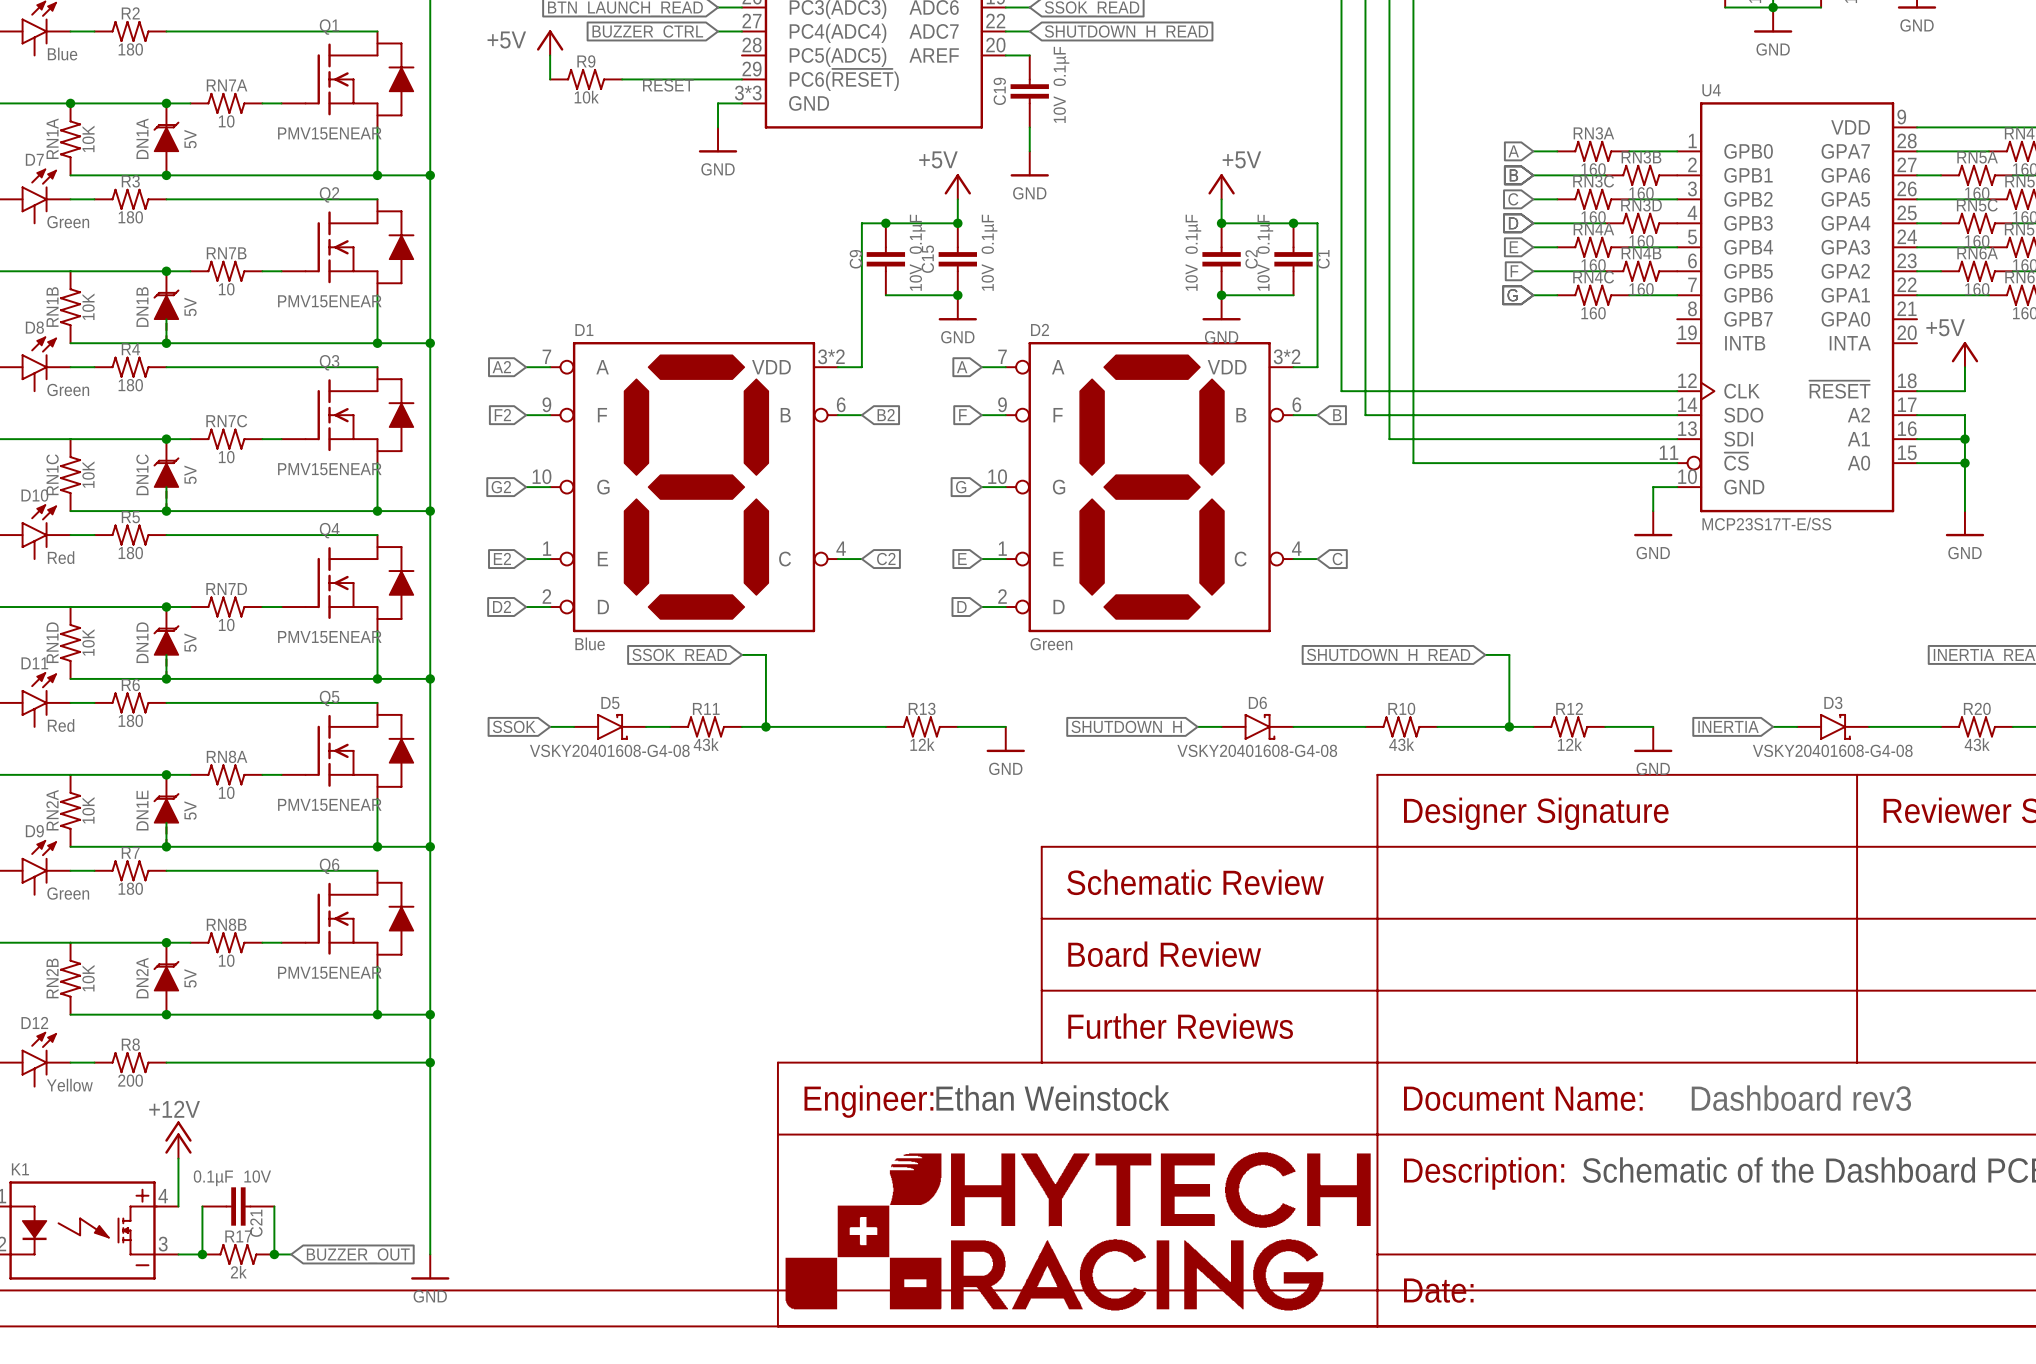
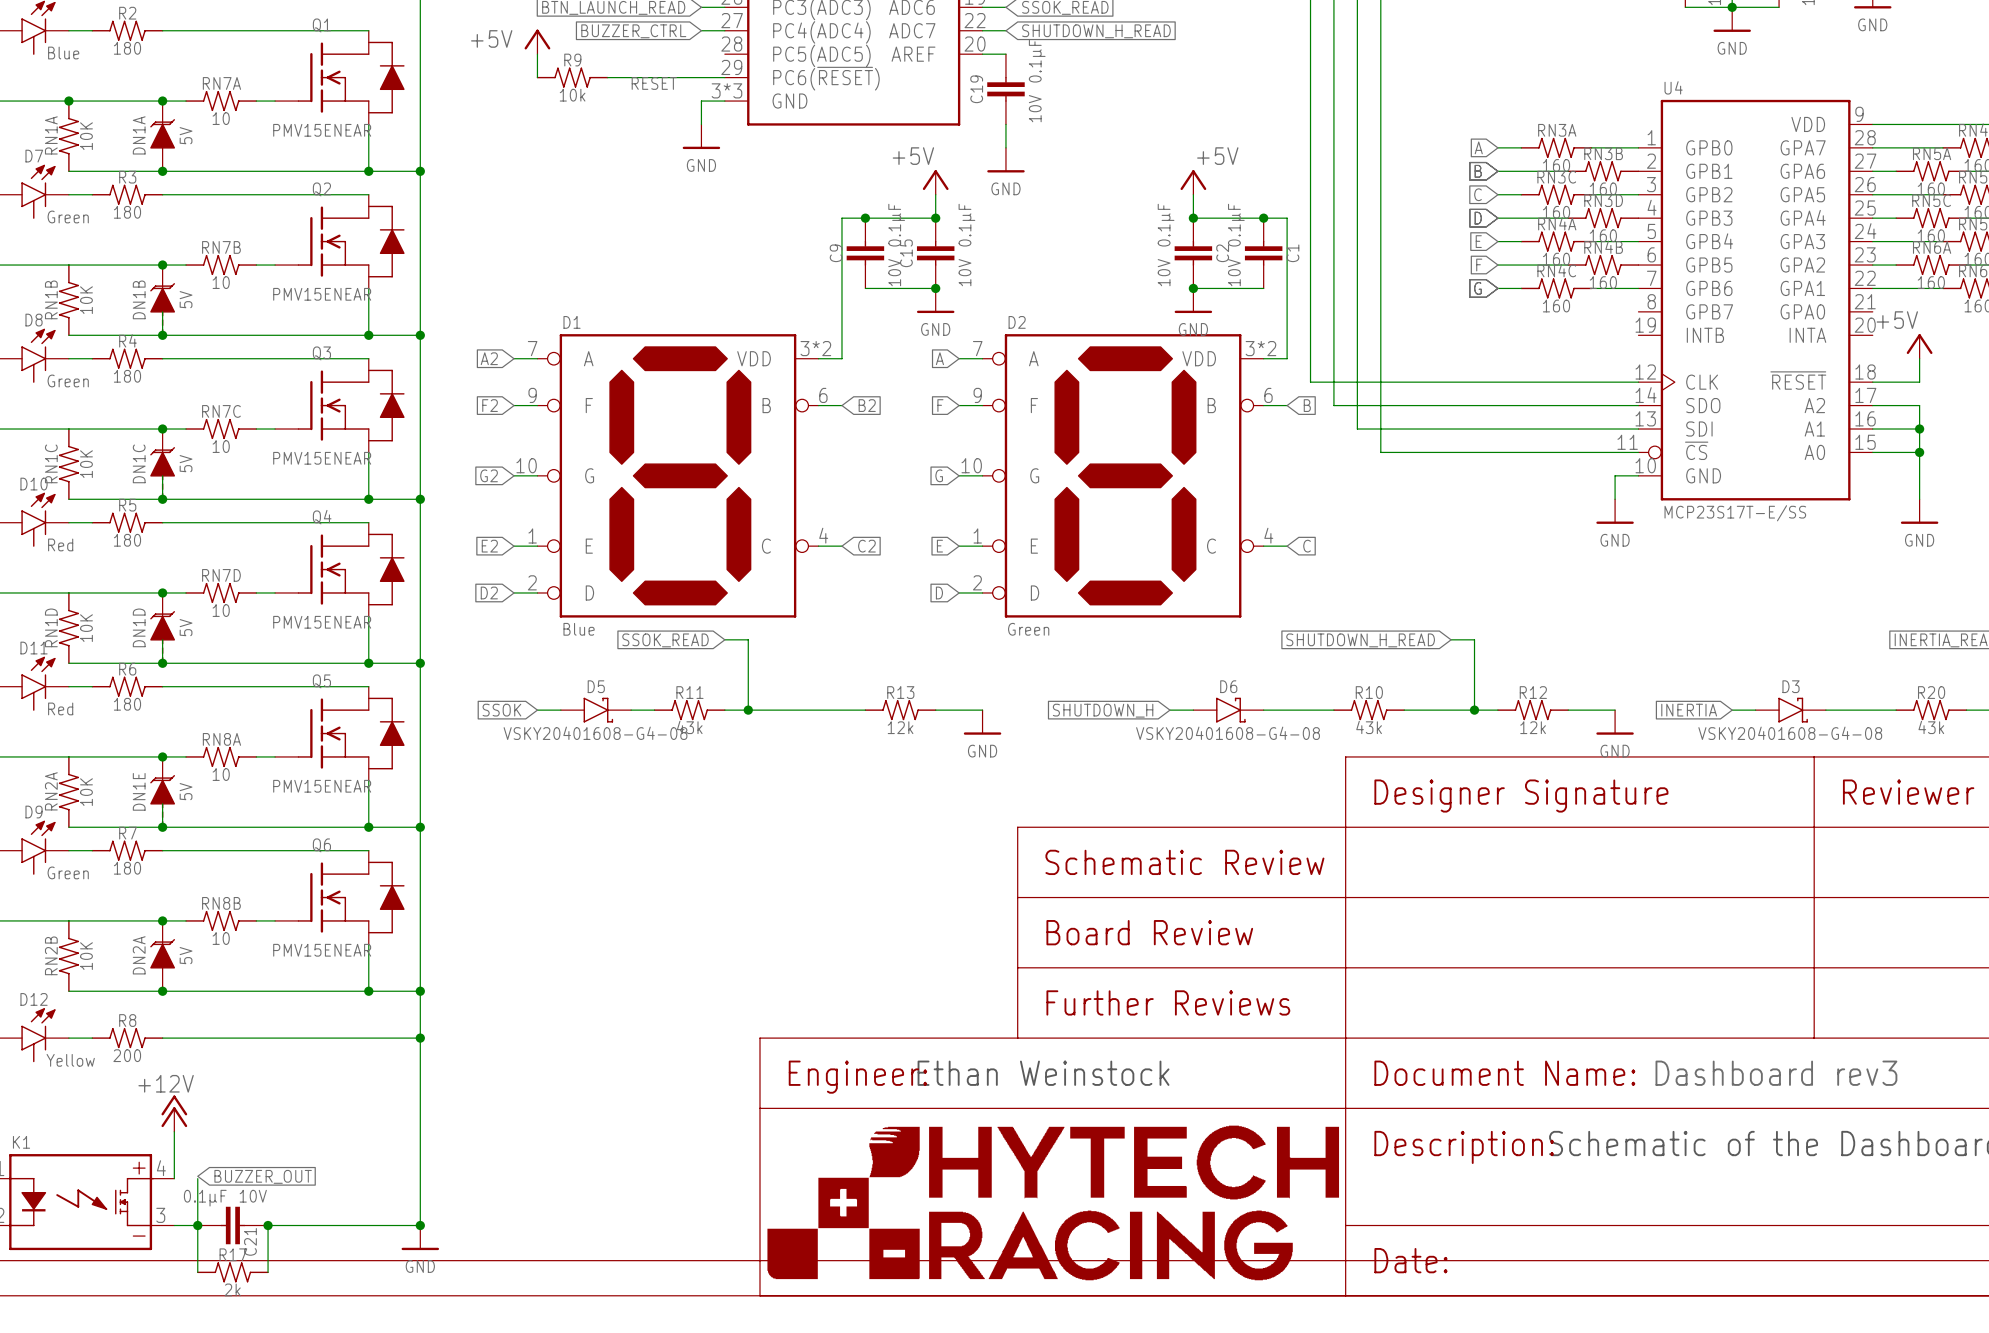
C21 position: (238, 1206) -> (232, 1225)
wire: (274, 1206) (274, 1254) -> (268, 1272) (268, 1225)
wire: none -> (197, 1225) (197, 1272)
R17 position: (238, 1254) -> (232, 1272)
wire: none -> (284, 1225) (420, 1225)
junction: none -> (420, 1225)
global label position: BUZZER_OUT (358, 1256) -> BUZZER_OUT (263, 1176)

